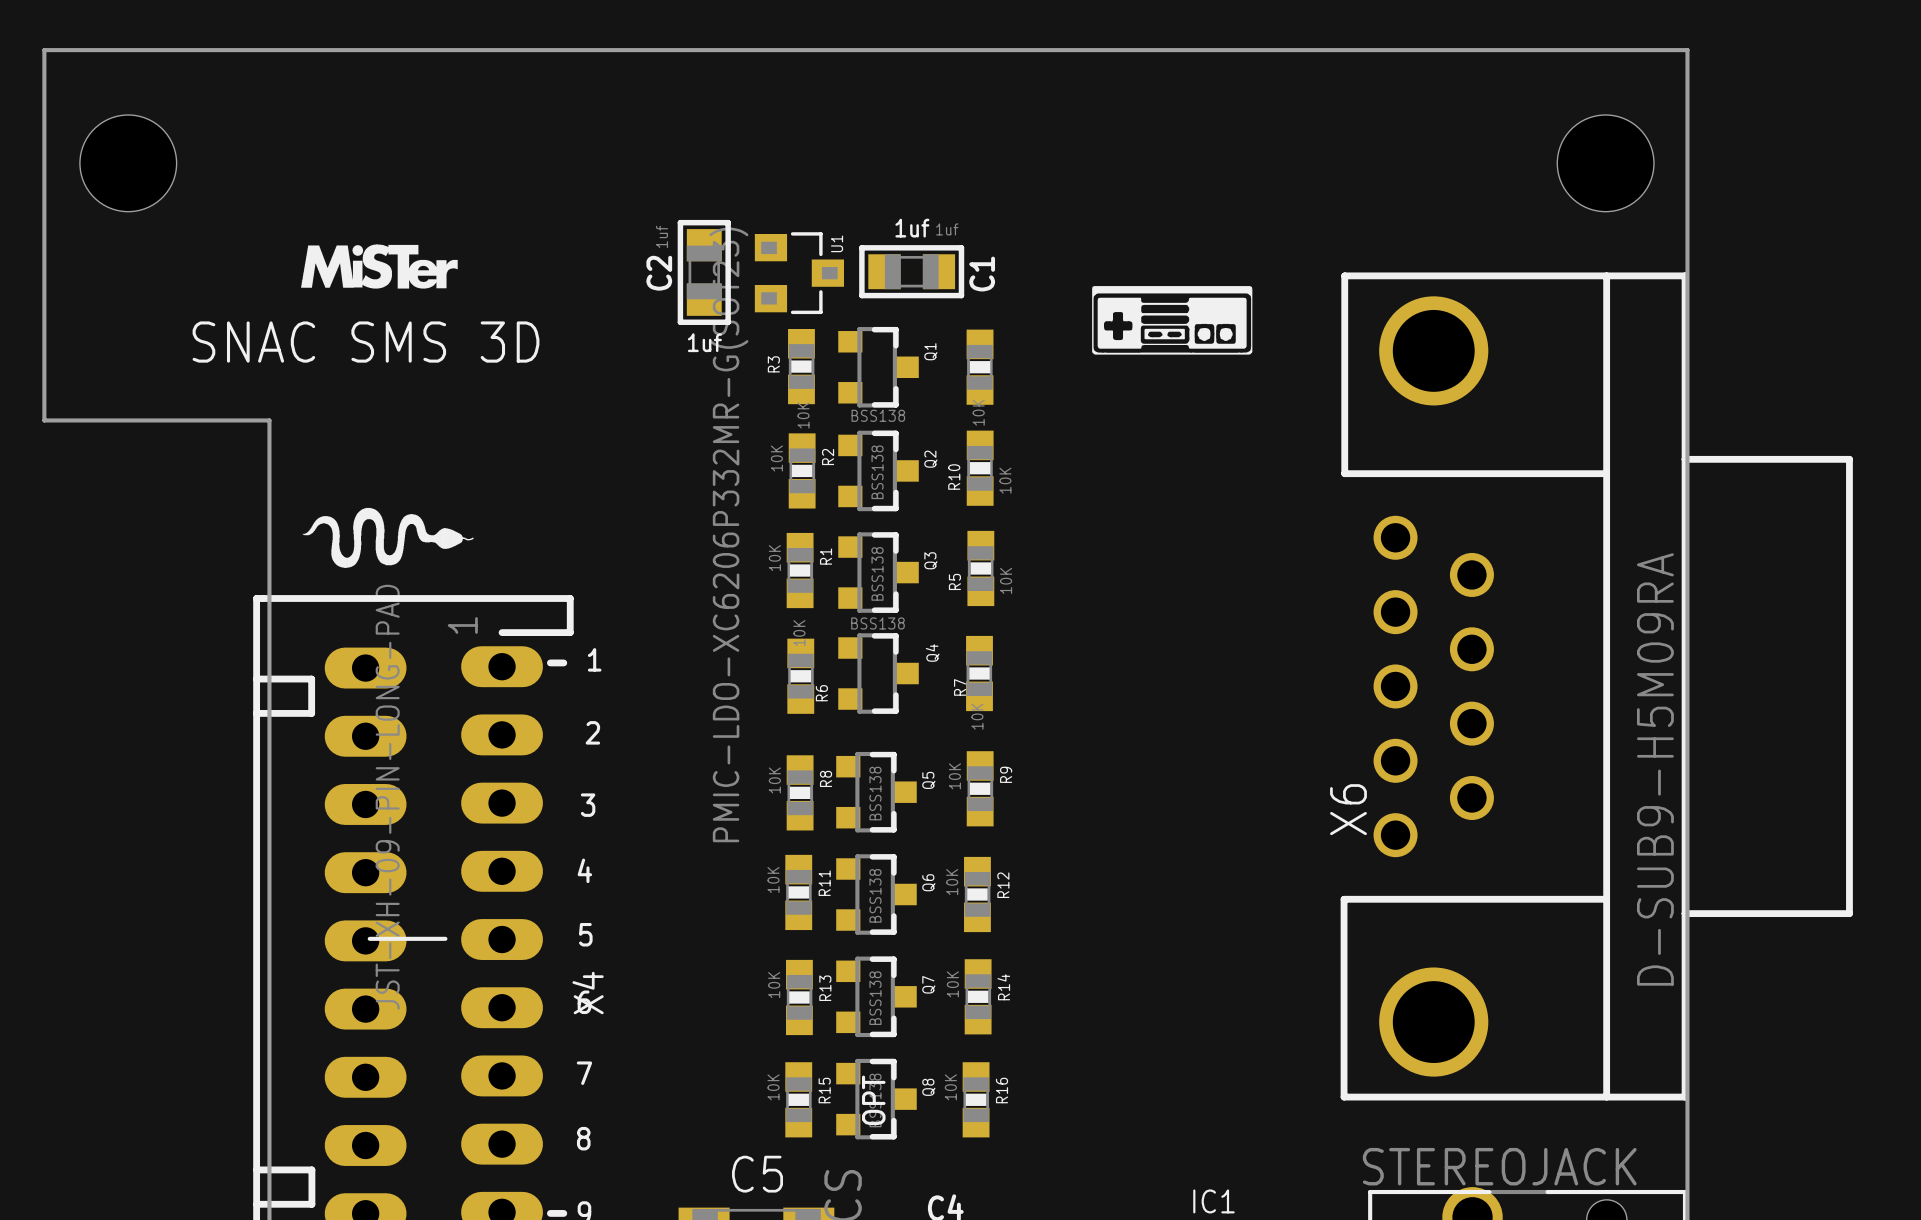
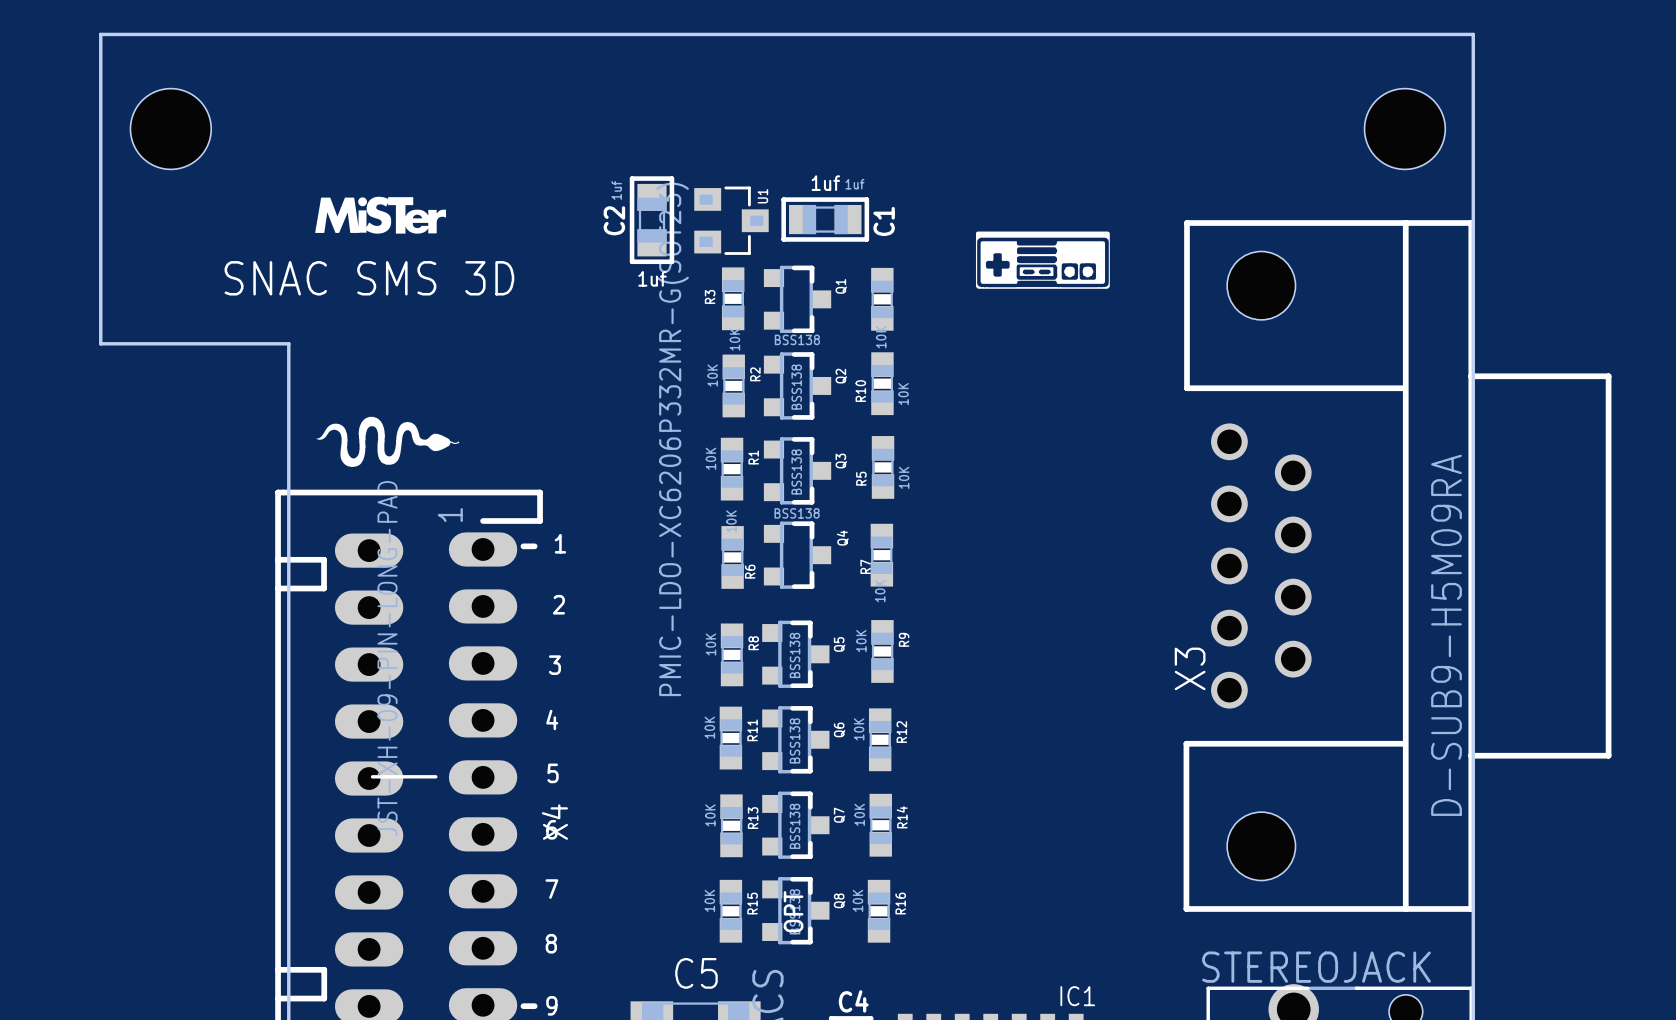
X6: D-SUB9-H5M09RA (1596, 686) -> none
X3: none -> D-SUB9-H5M09RA (1397, 566)

